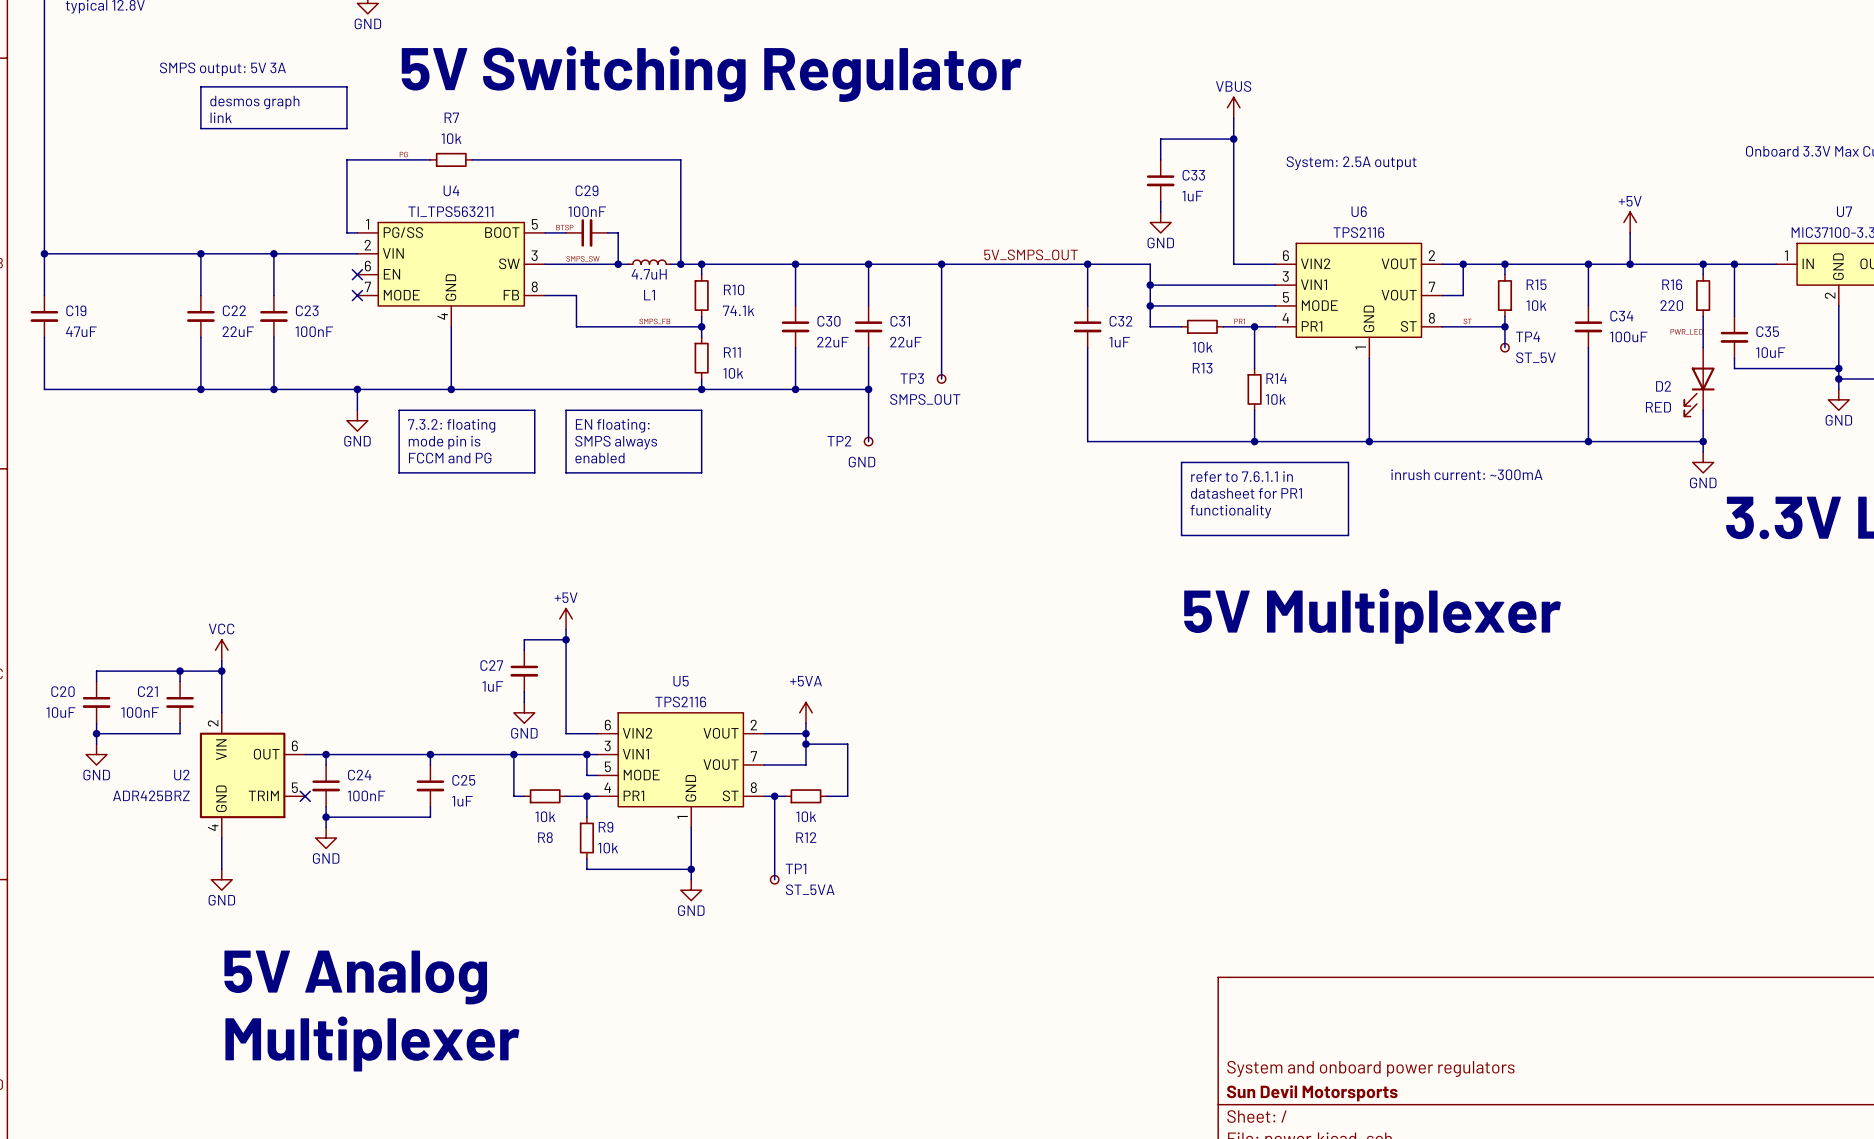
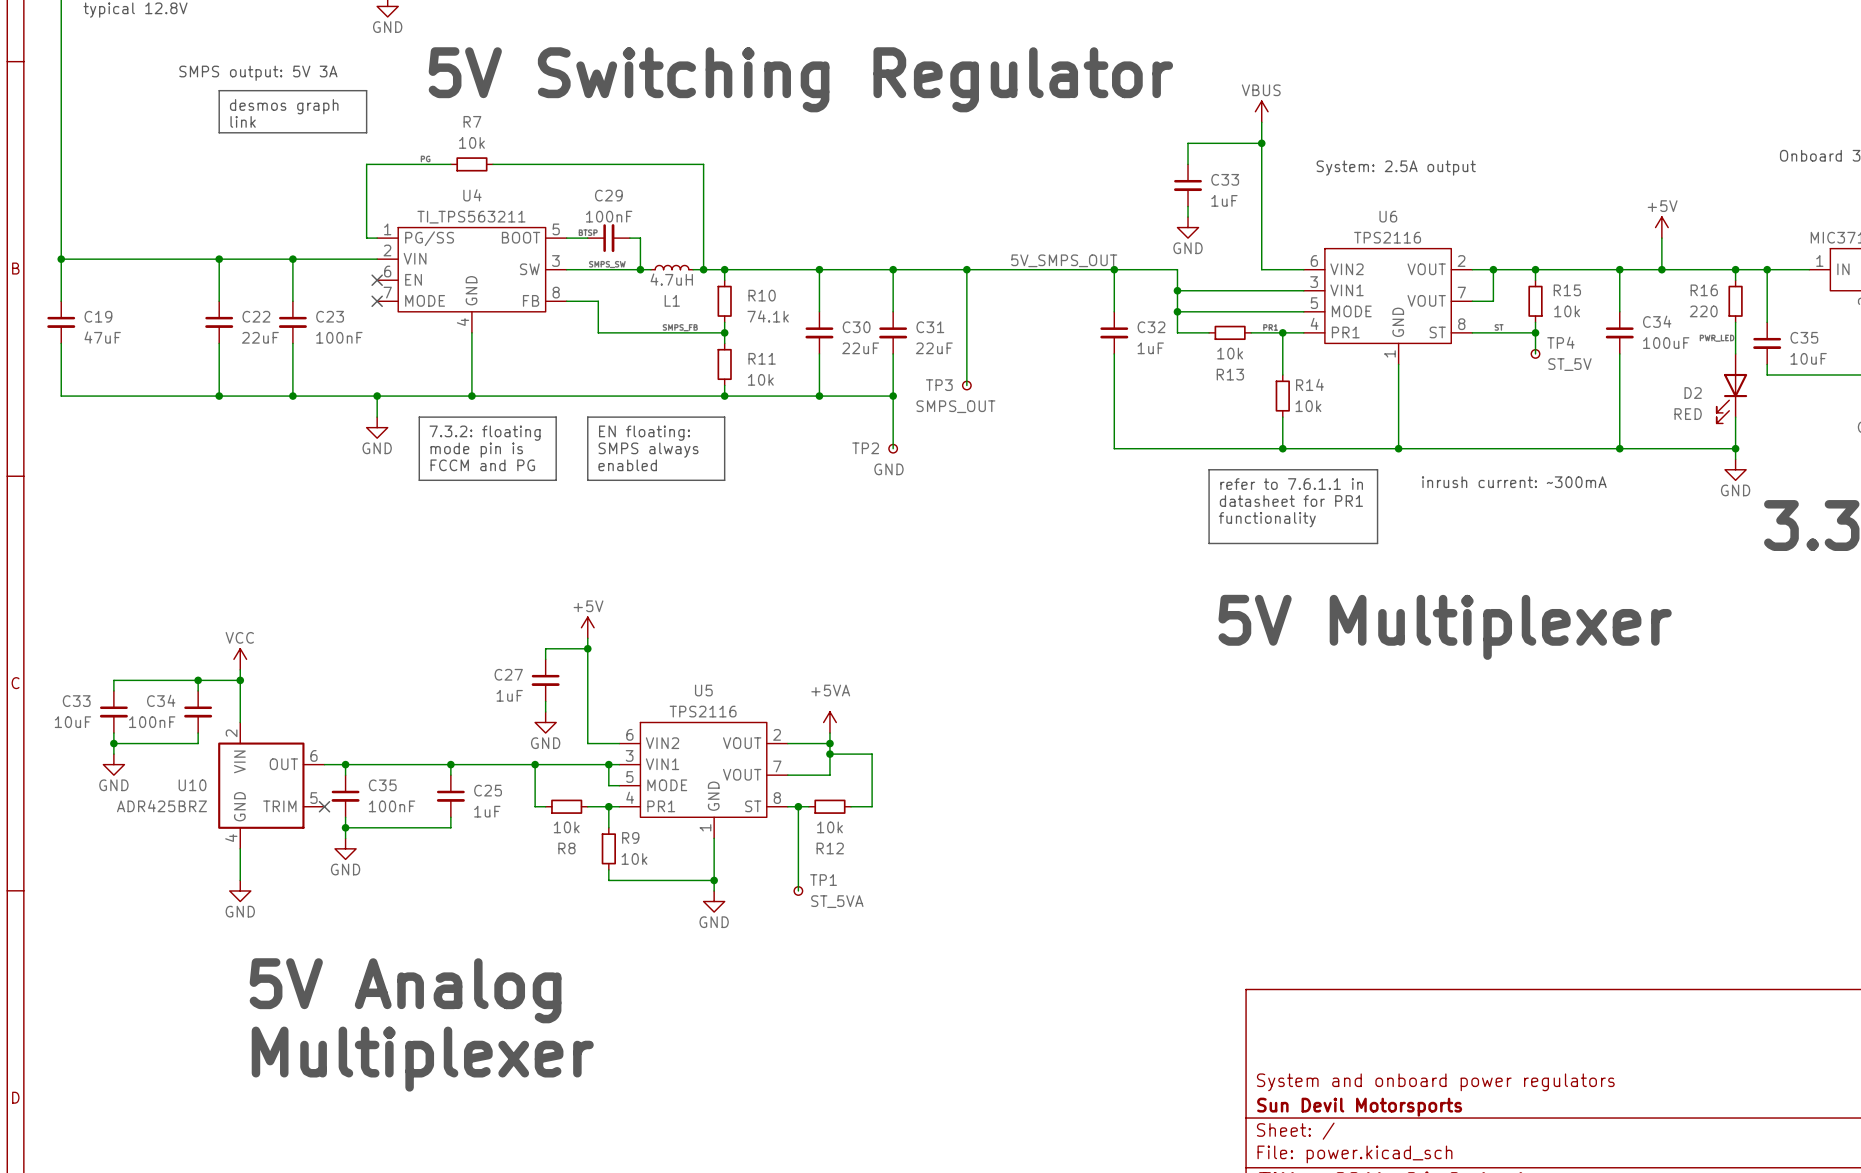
C20 name: C20 (63, 691) -> C33 (76, 701)
C21 name: C21 (147, 691) -> C34 (161, 700)
U2 name: U2 (181, 775) -> U10 (192, 785)
C24 name: C24 (359, 775) -> C35 (382, 785)

